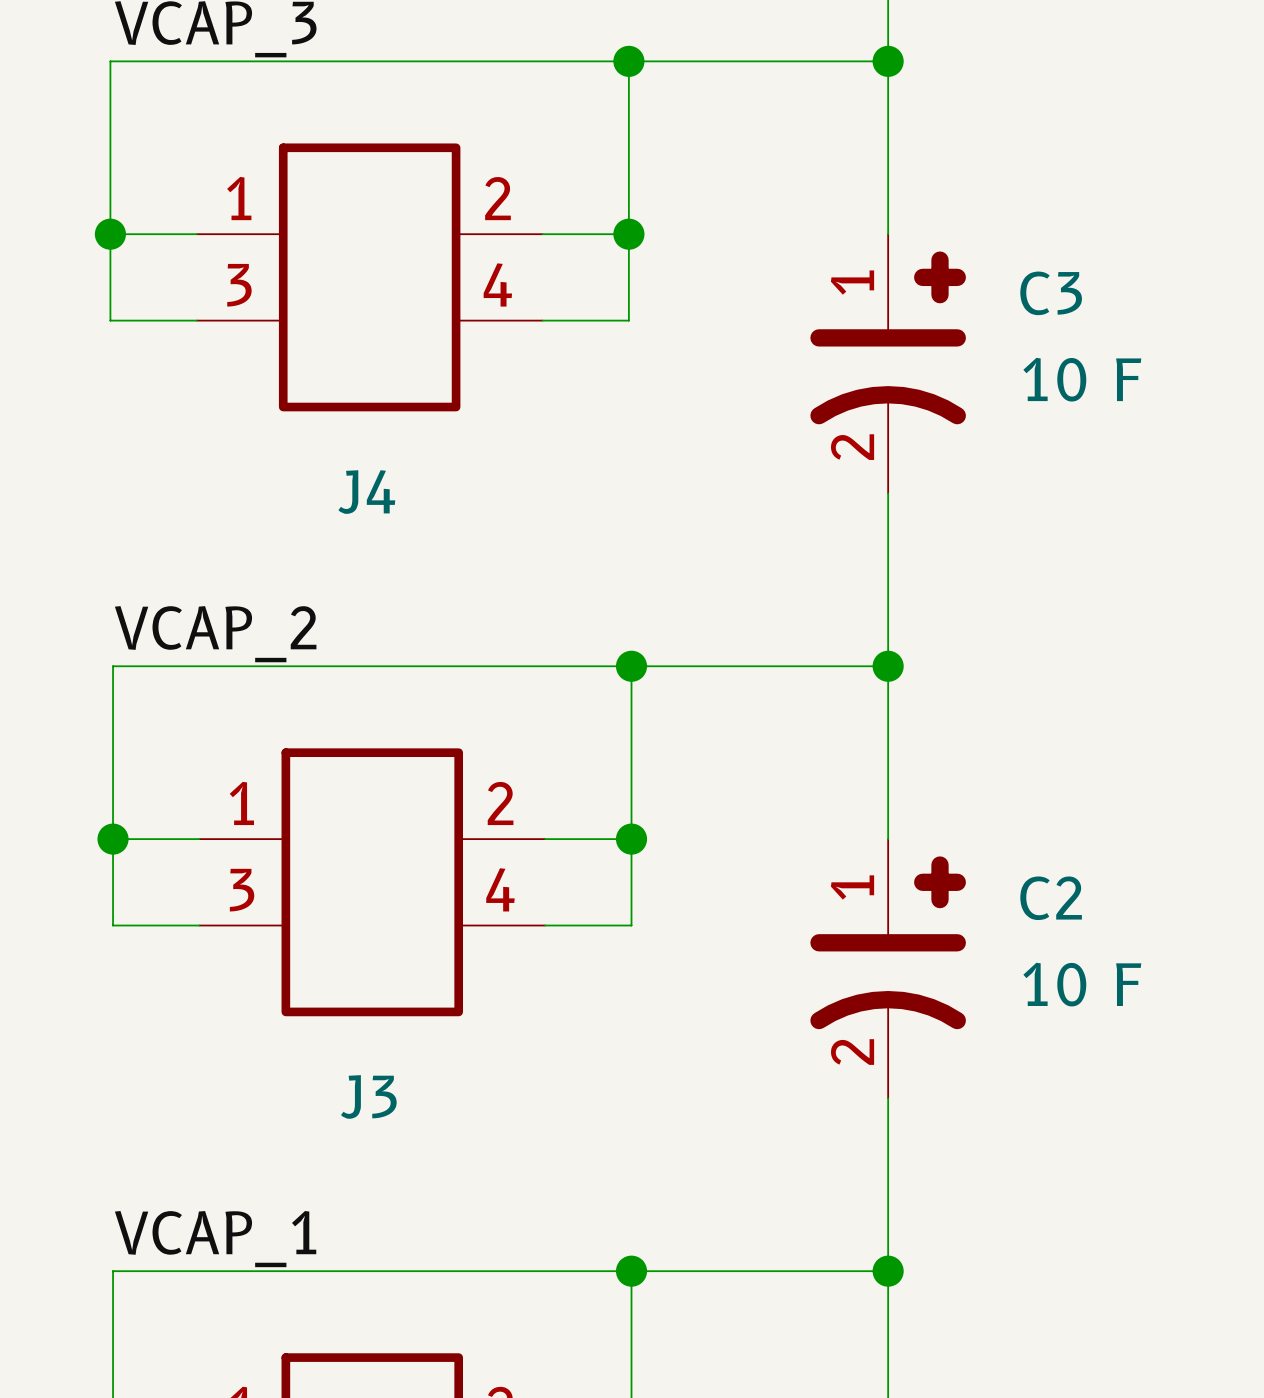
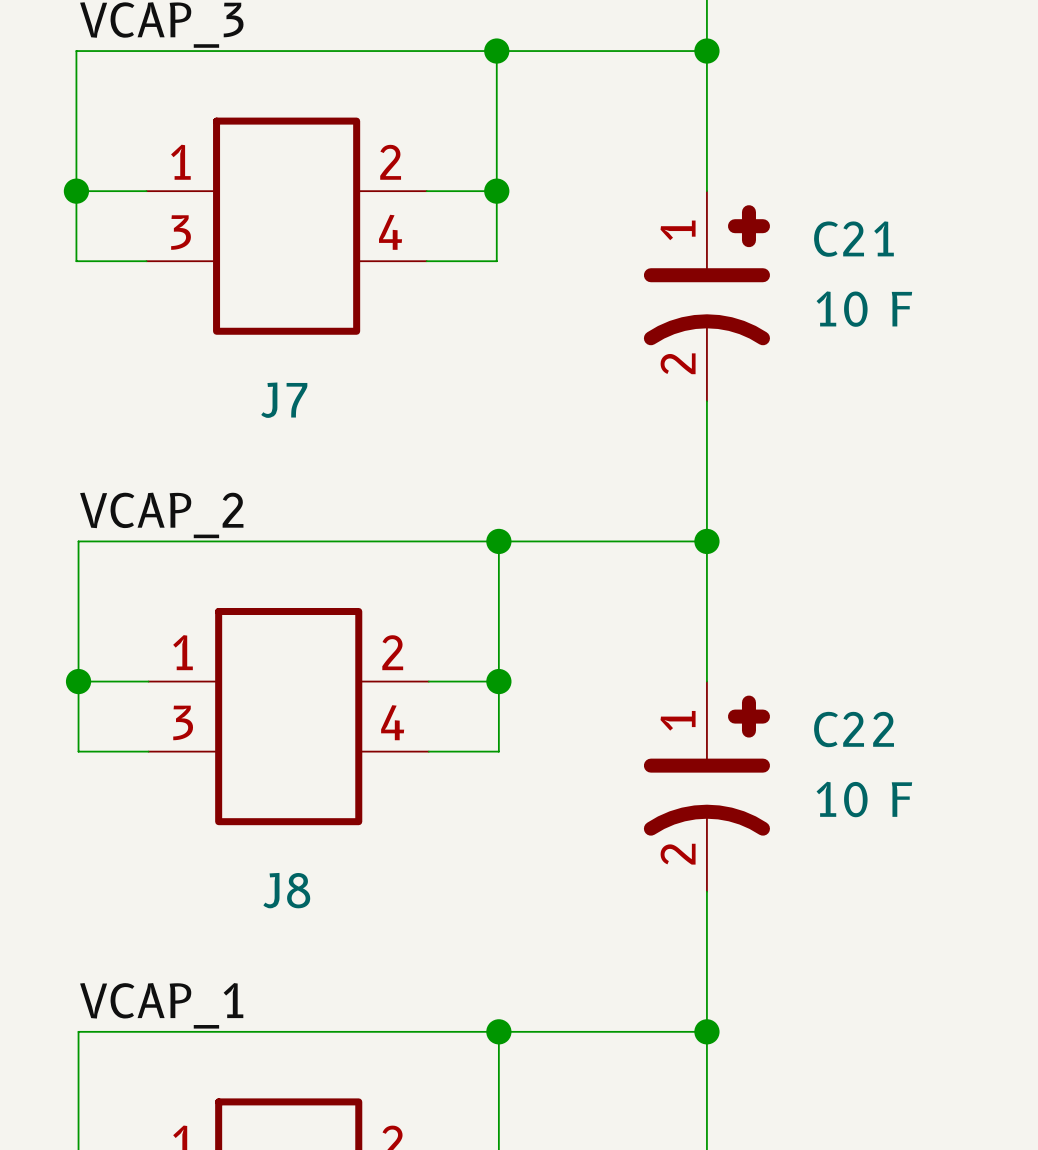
C3 name: C3 (1051, 293) -> C21 (853, 239)
J4 name: J4 (366, 492) -> J7 (284, 400)
C2 name: C2 (1051, 898) -> C22 (854, 729)
J3 name: J3 (368, 1096) -> J8 (286, 890)

